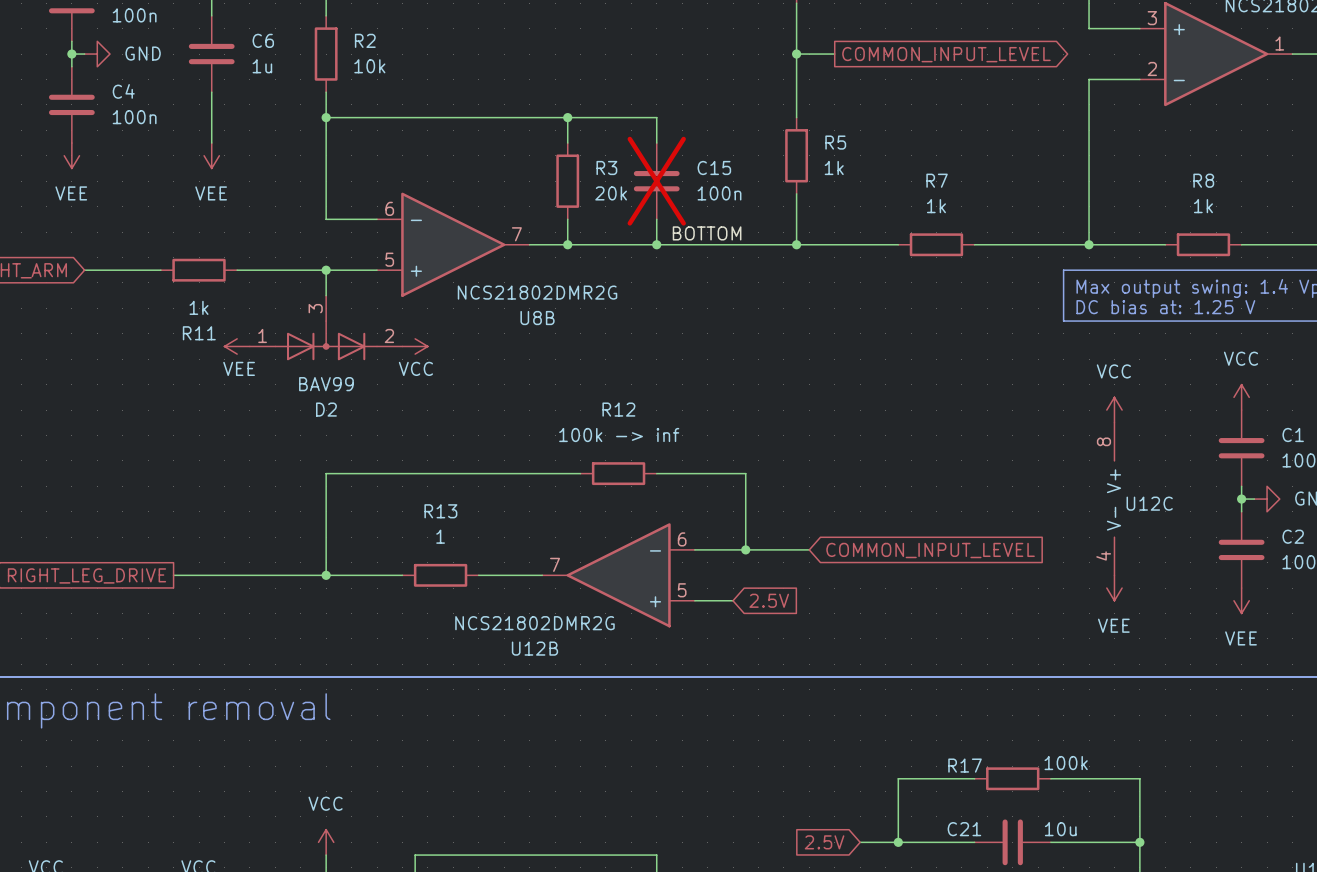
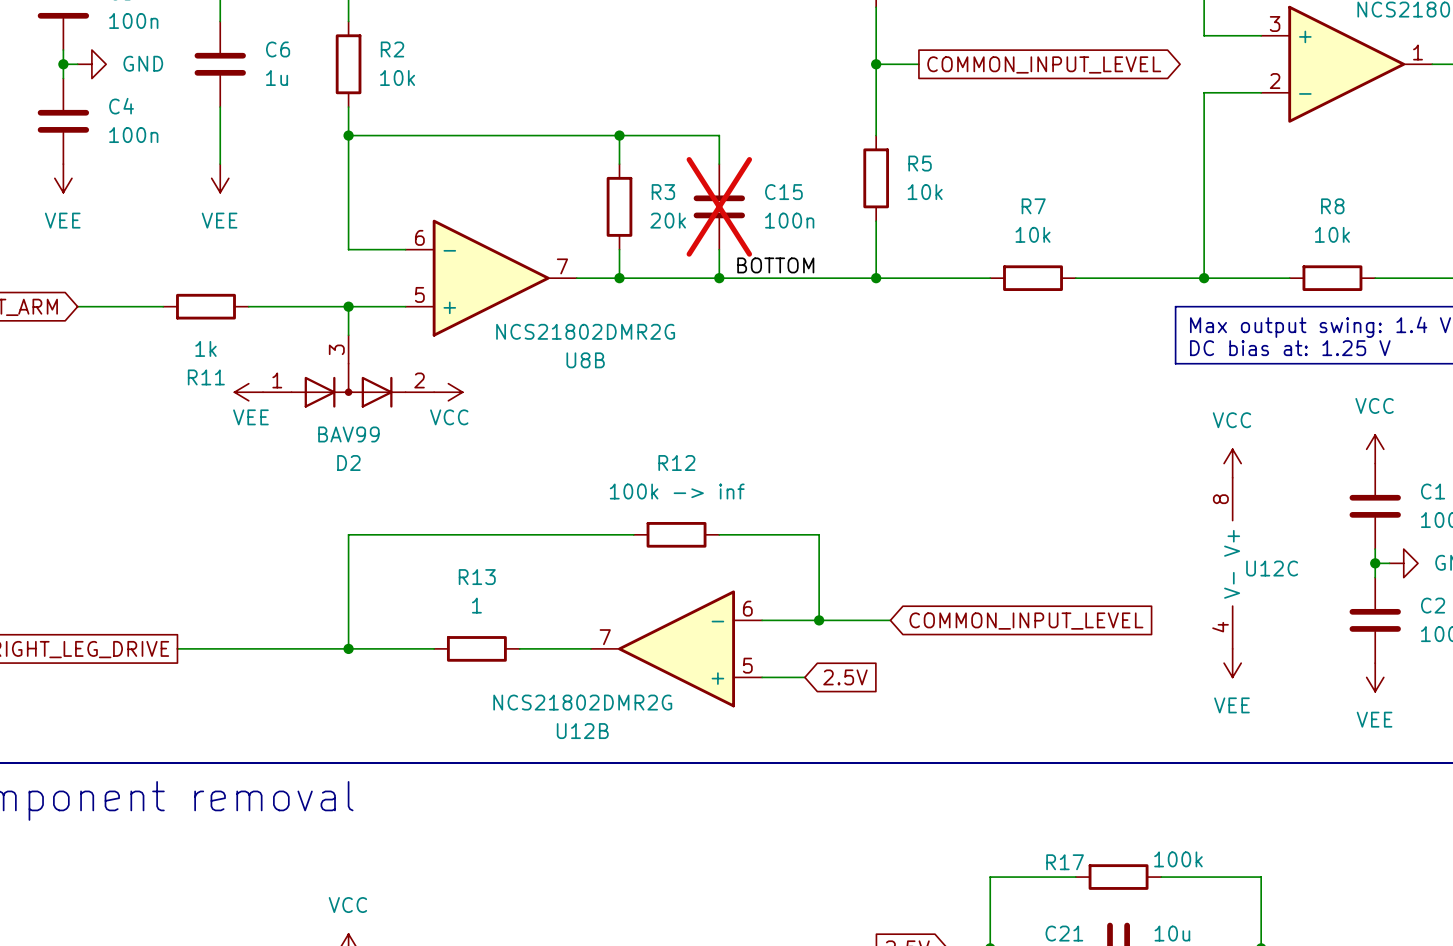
R5 value: 1k (834, 167) -> 10k (925, 192)
R7 value: 1k (936, 206) -> 10k (1033, 234)
R8 value: 1k (1203, 206) -> 10k (1332, 234)

